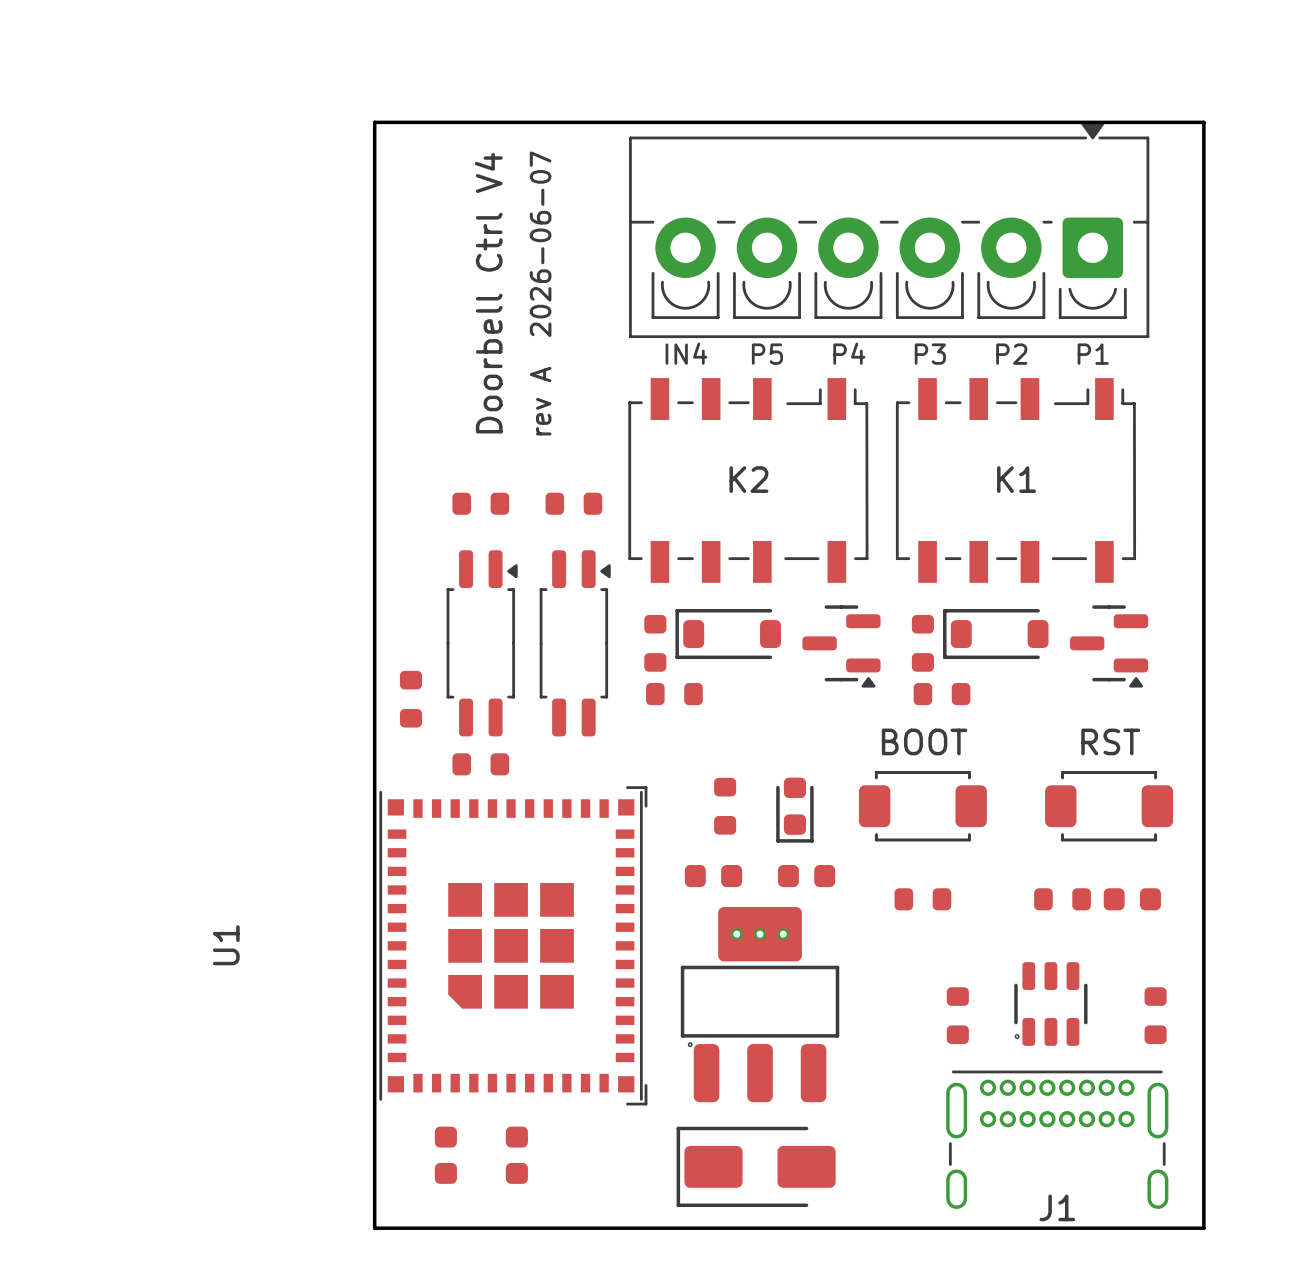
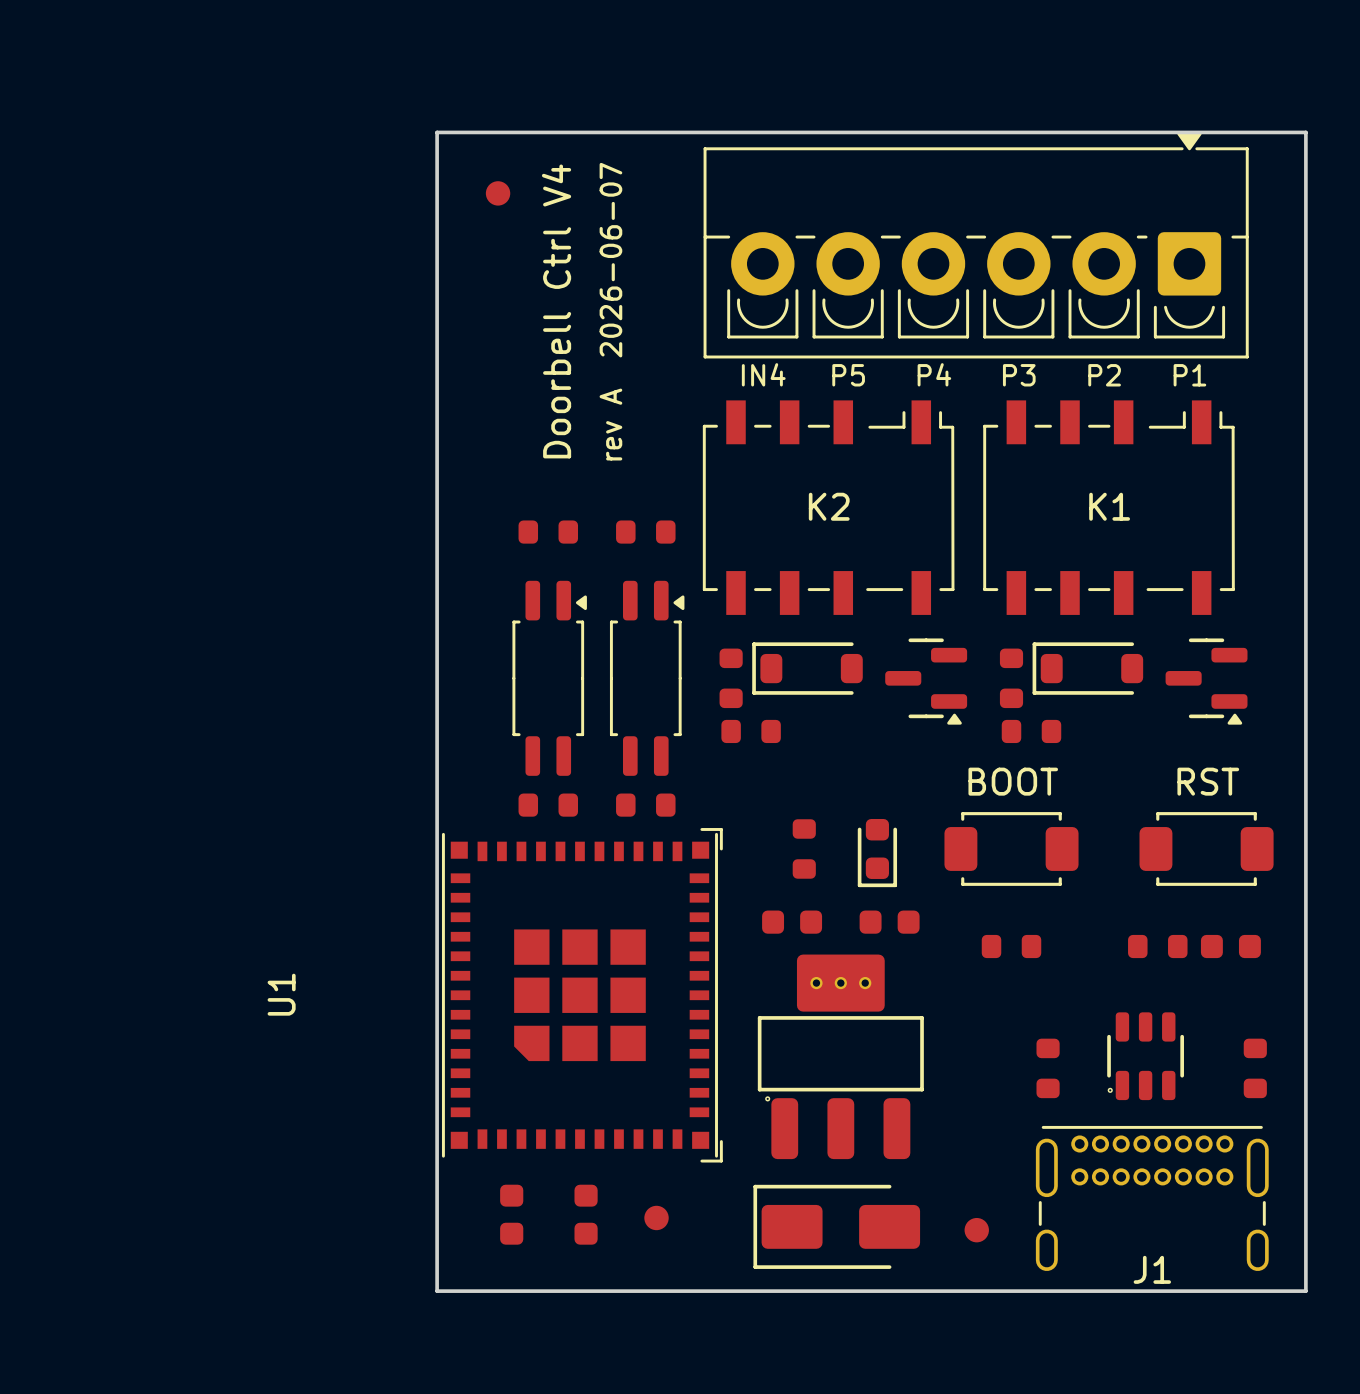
part: none -> (498, 193)
part rotation: 0° (411, 699) -> 90° clockwise (645, 805)
part position: (411, 699) -> (645, 805)
part: none -> (656, 1217)
part: none -> (976, 1230)

